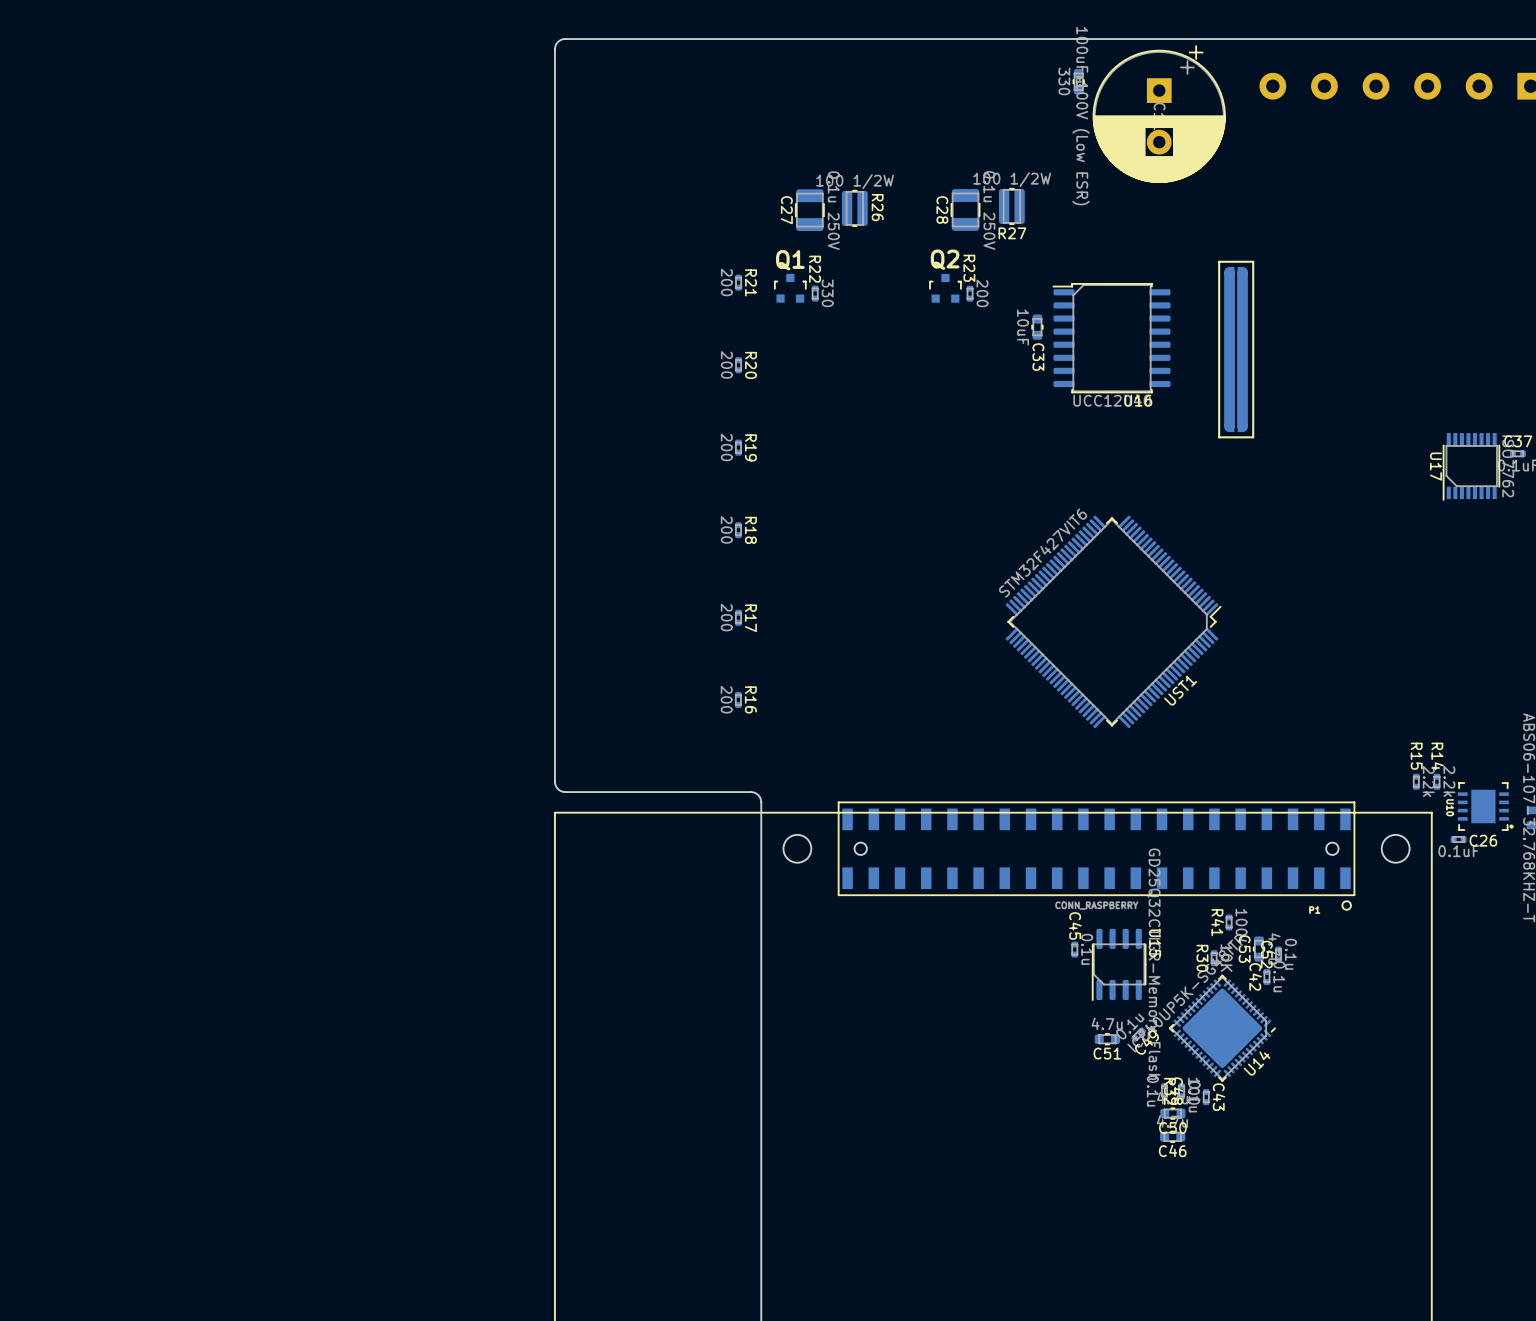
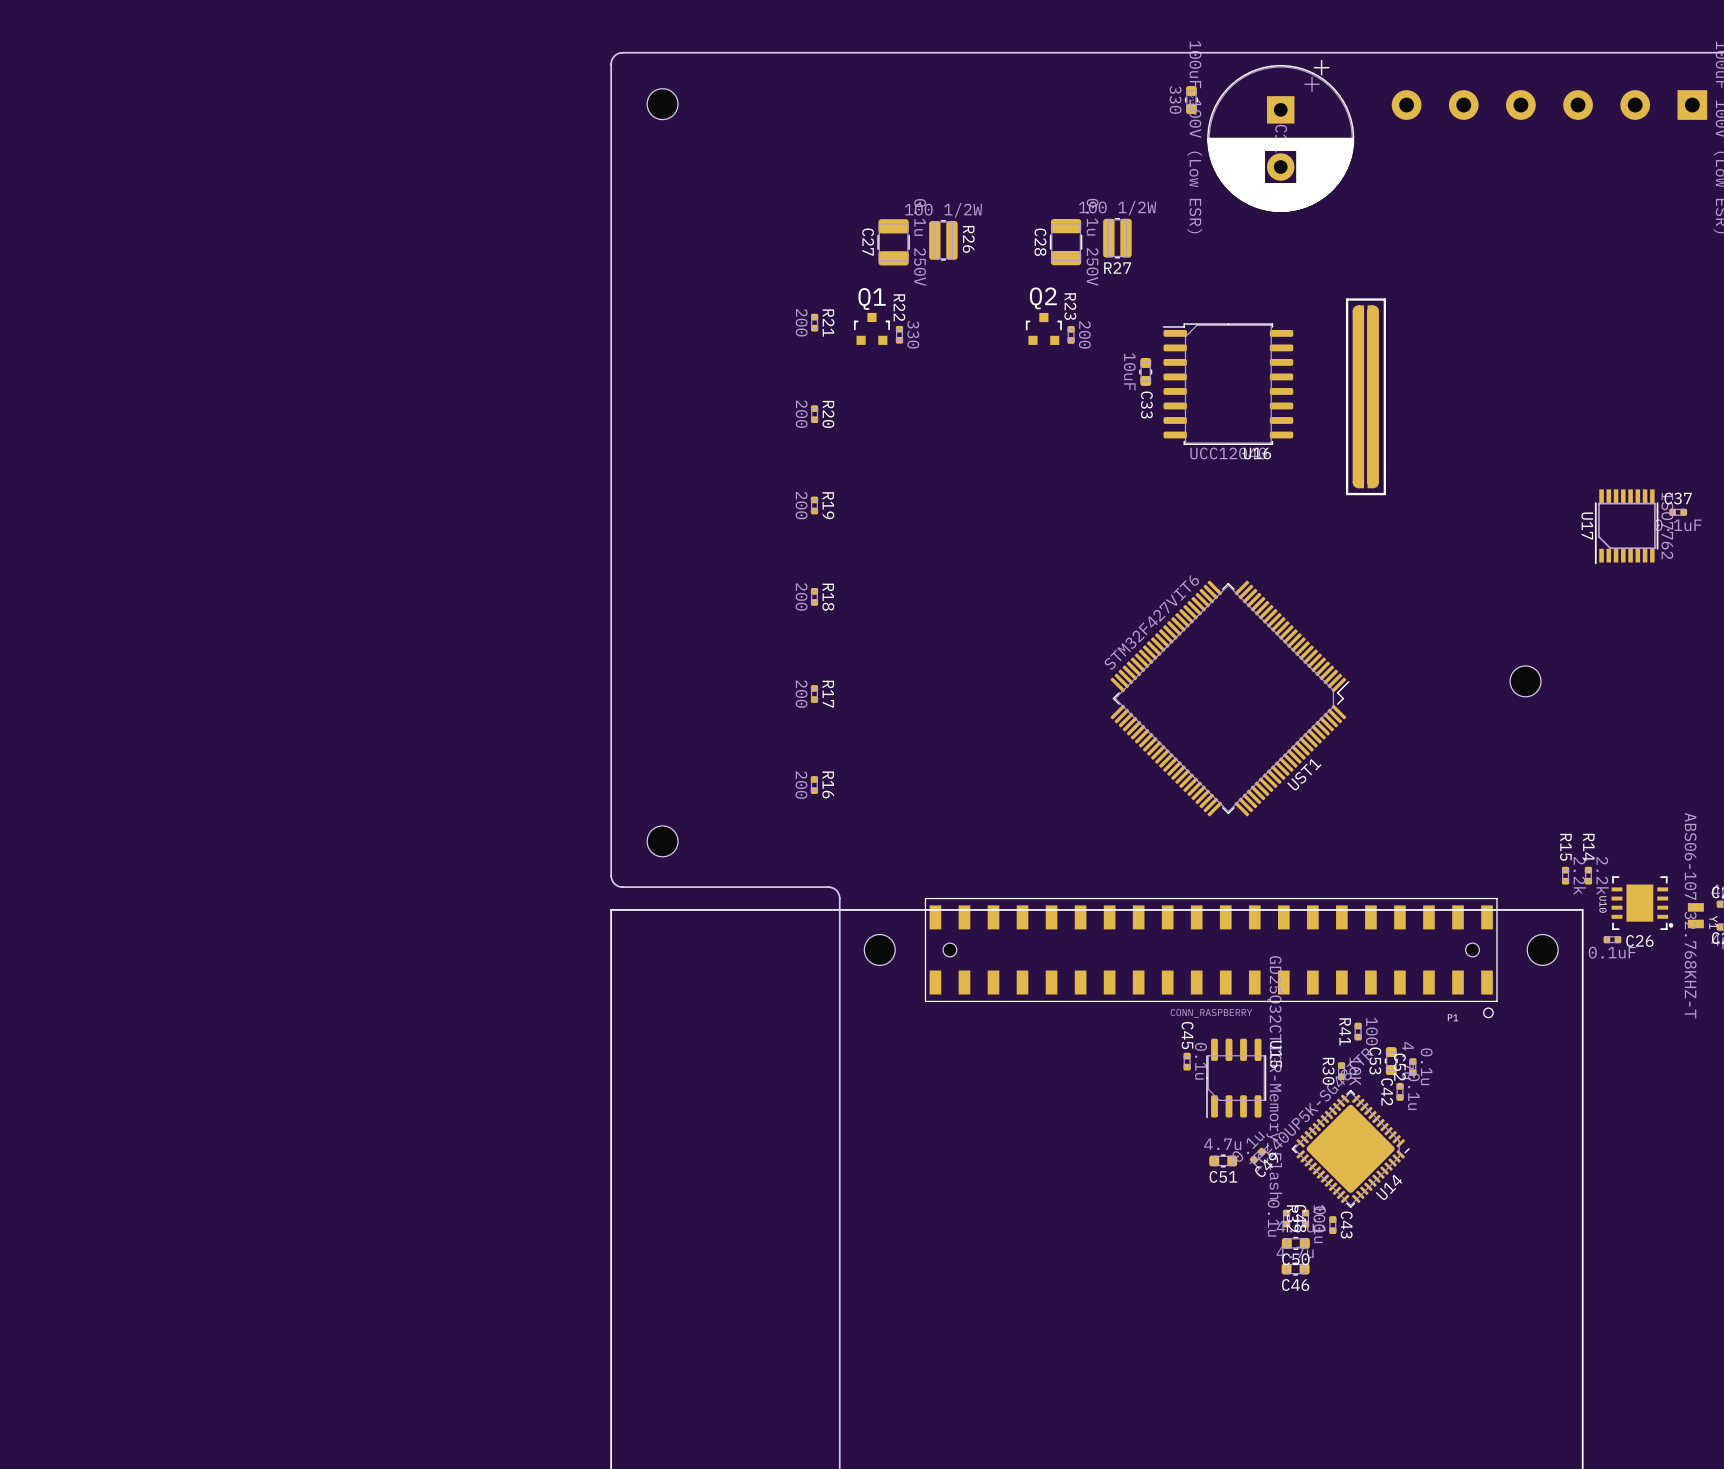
part: none -> (662, 104)
part: none -> (1525, 681)
part: none -> (662, 841)

